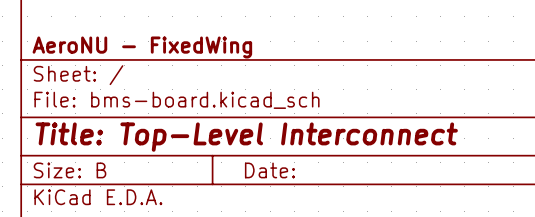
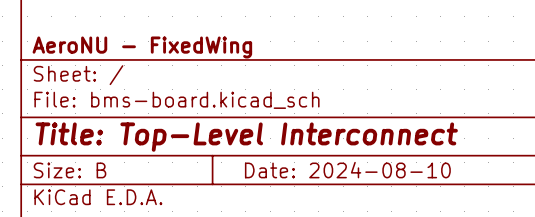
title block: Date: (269, 170) -> Date: 2024-08-10 (347, 170)

